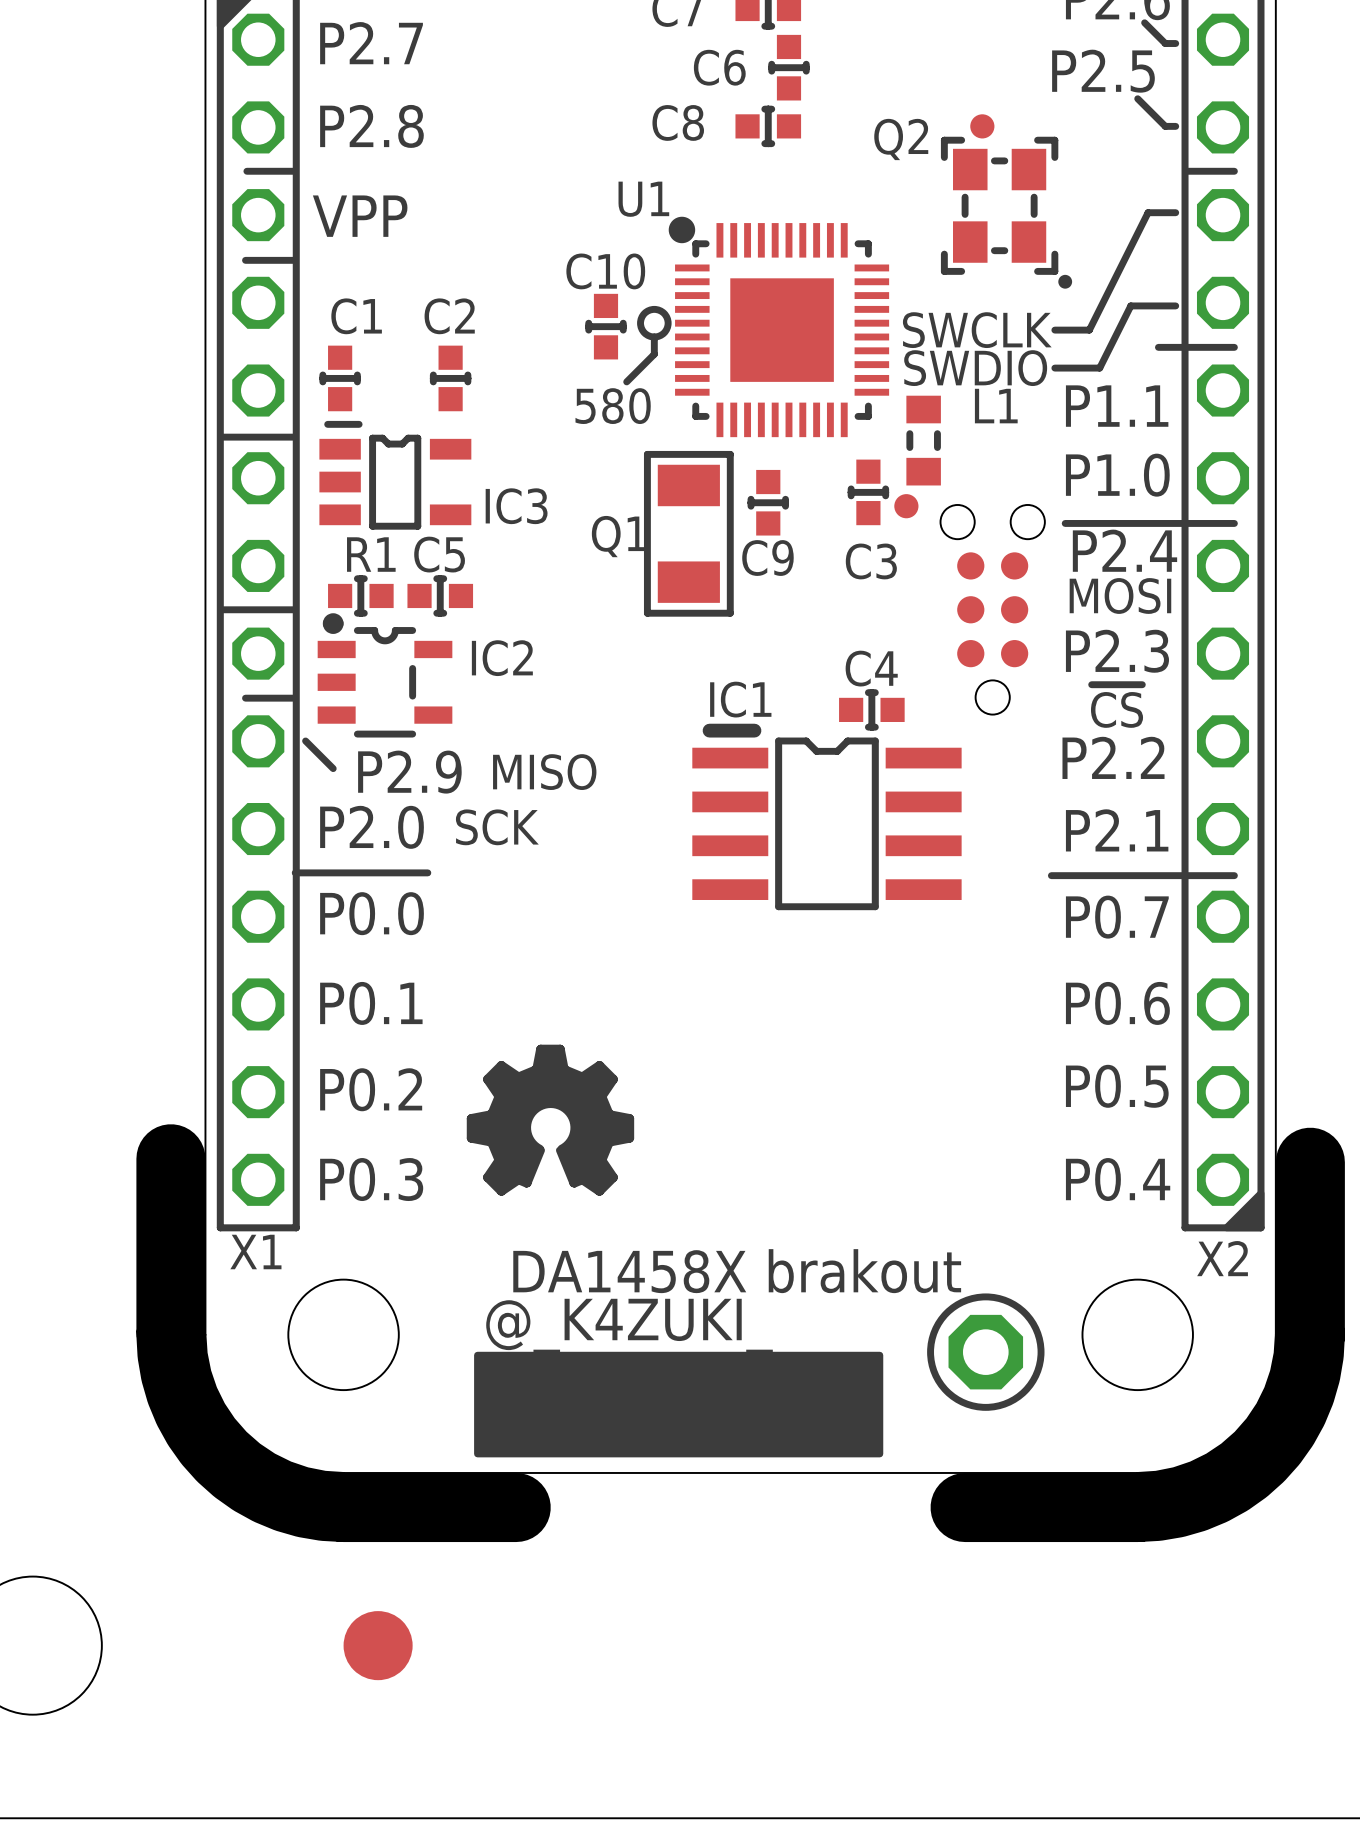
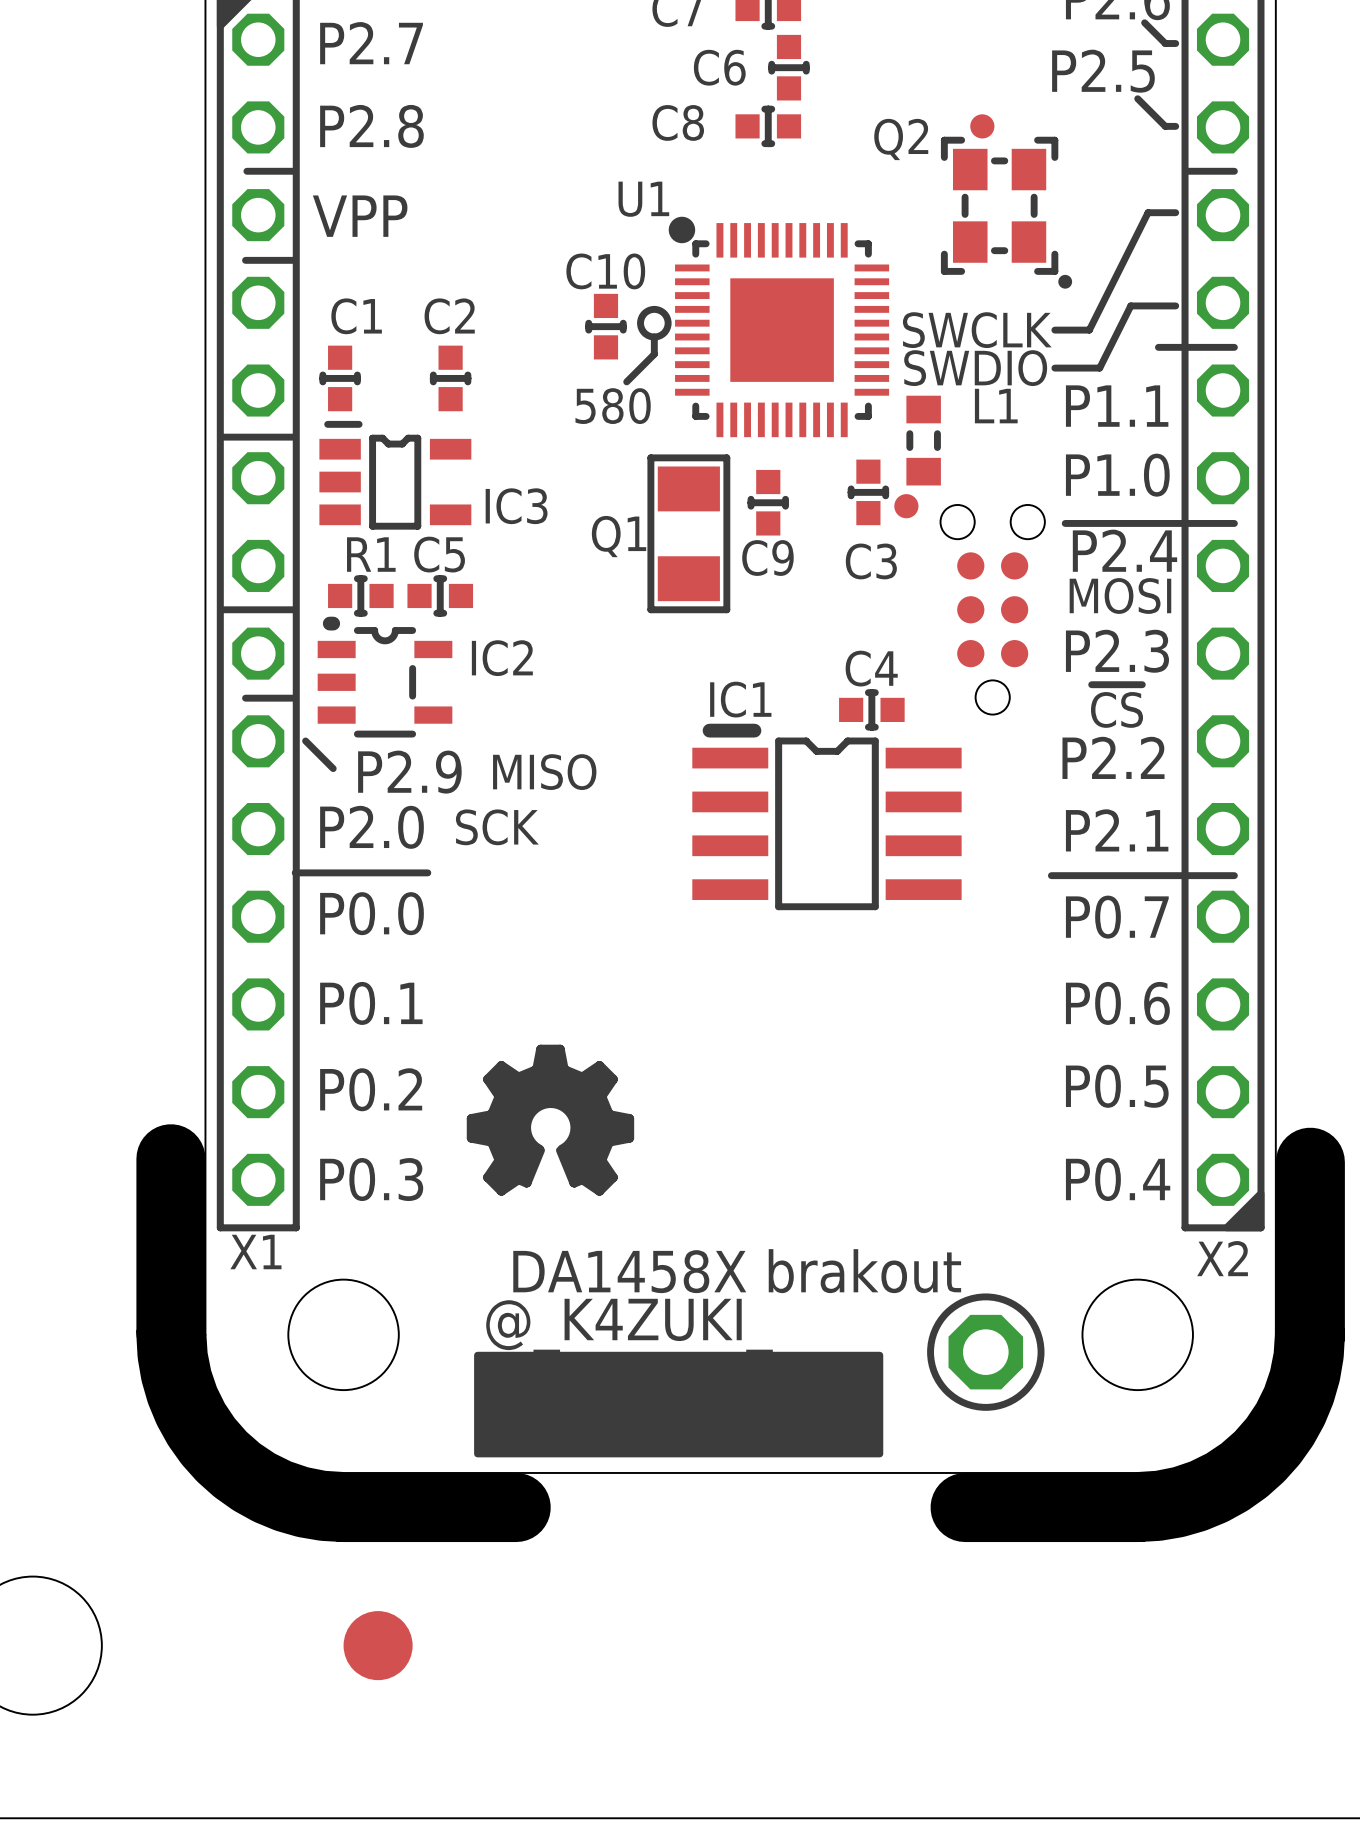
Q1 footprint: [643, 450, 734, 617] -> [647, 454, 731, 614]
IC2 footprint: [317, 613, 453, 738] -> [317, 616, 453, 738]

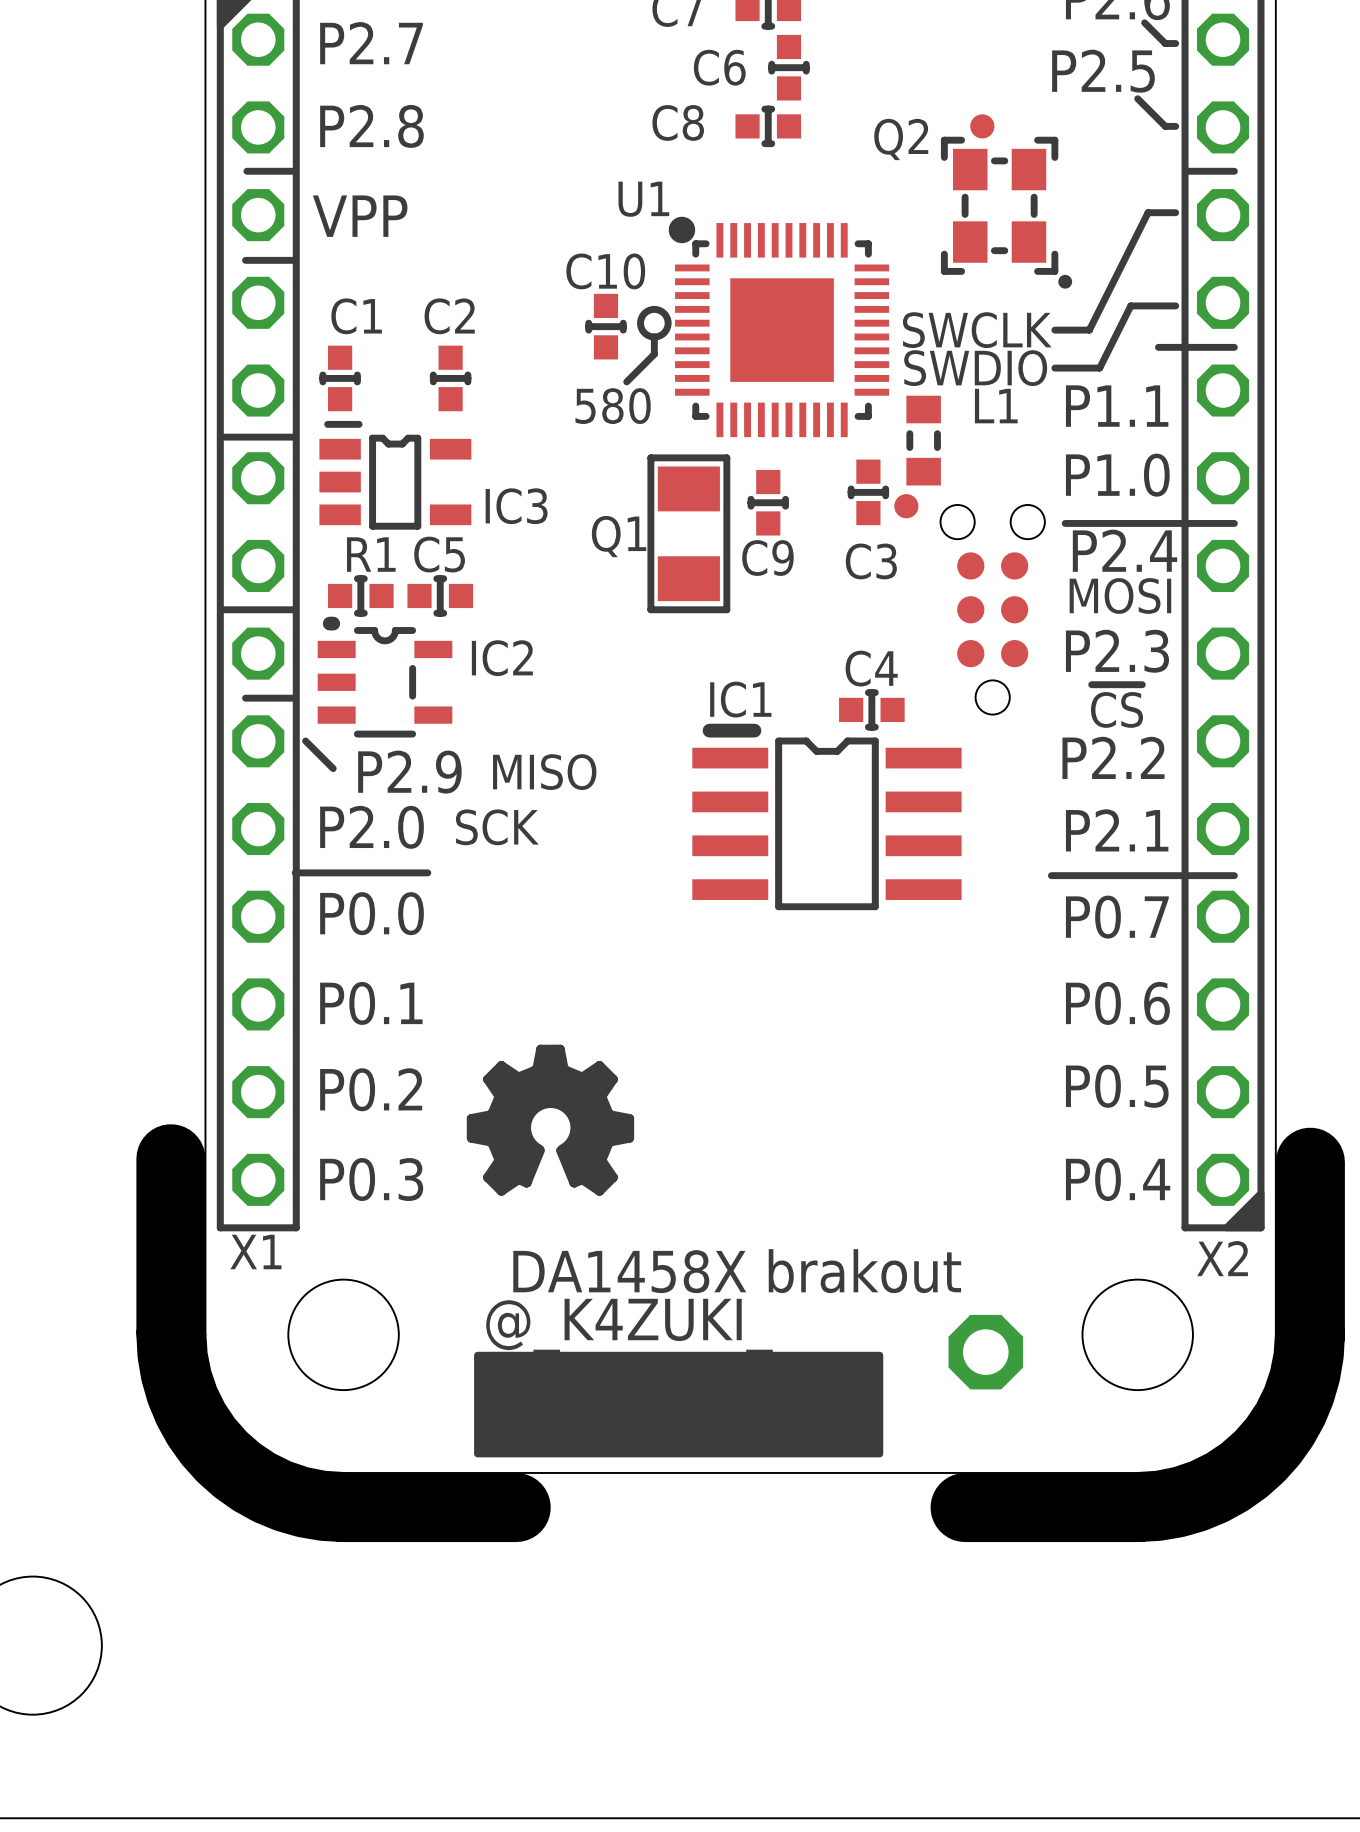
drawing: [927, 1293, 1045, 1411] -> none
part: (378, 1645) -> none

